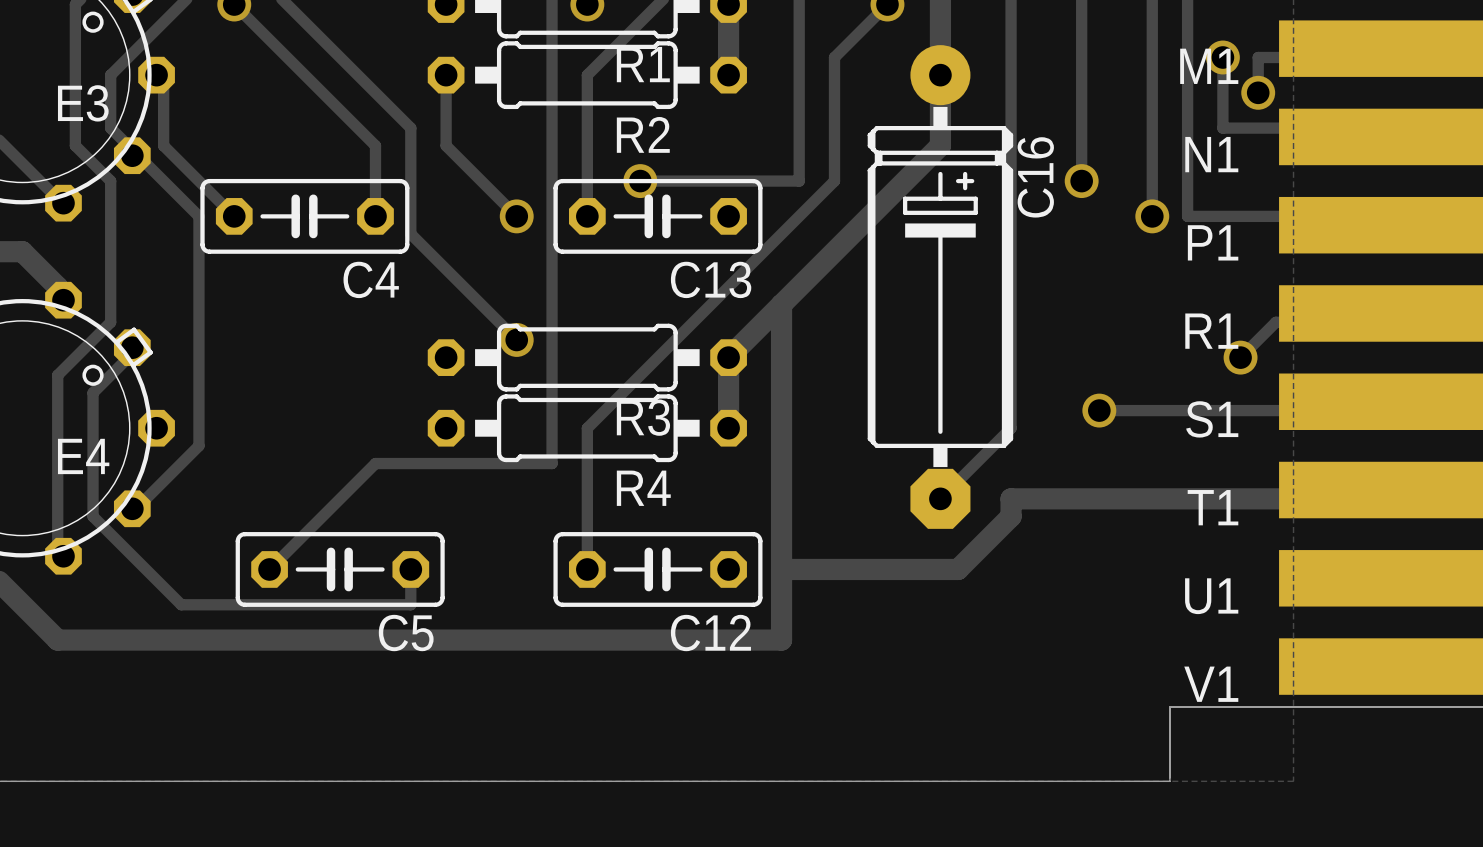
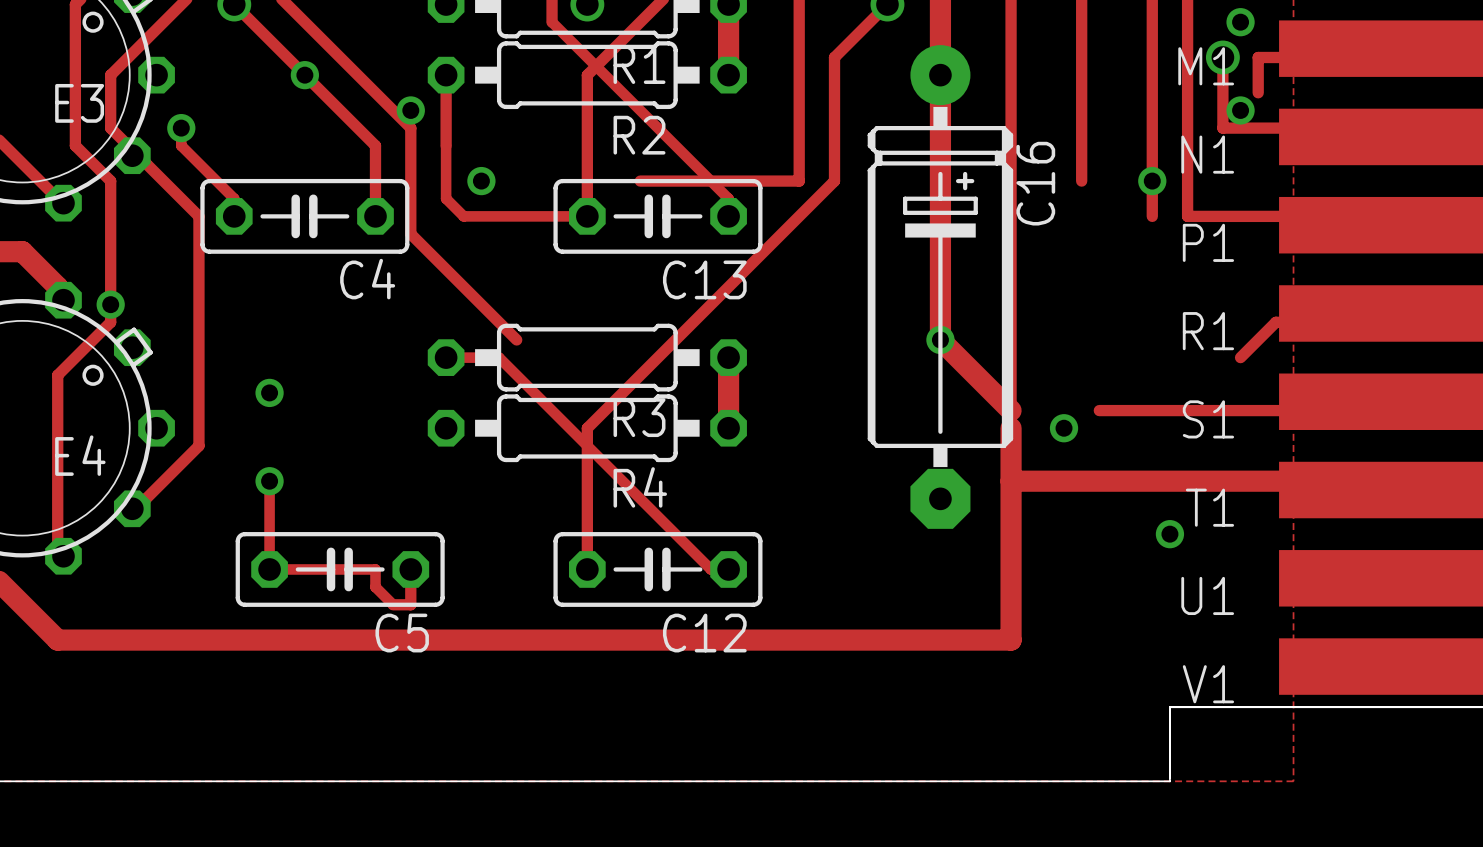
track: (552, 22) (552, 463) (375, 463) (269, 569) -> (552, 22) (728, 198) (728, 216)
via: none -> (1240, 22)
track: (156, 75) (163, 75) (163, 145) (234, 216) -> (181, 128) (181, 145) (234, 198) (234, 216)
via: none -> (304, 75)
via position: (1258, 92) -> (1240, 110)
via: none -> (410, 110)
via: none -> (181, 128)
track: (446, 145) (516, 216) -> (446, 145) (446, 198) (463, 216) (587, 216)
track: (940, 145) (728, 357) -> (940, 145) (940, 339) (1011, 410)
via: none -> (481, 181)
via: (640, 181) -> none
via: (1081, 181) -> none
via: none -> (1152, 181)
via: (516, 216) -> none
via: (1152, 216) -> none
via: none -> (110, 304)
track: (781, 304) (781, 640) -> none
via: (516, 339) -> none
via: none -> (940, 339)
track: (132, 347) (128, 357) (93, 392) (93, 516) (181, 604) (393, 604) -> (269, 481) (269, 569) (375, 569) (375, 587) (393, 604)
track: none -> (446, 357) (499, 357) (710, 569) (728, 569)
via: (1240, 357) -> none
via: none -> (269, 392)
via: (1099, 410) -> none
track: (1011, 428) (940, 498) -> (1011, 428) (1011, 498)
via: none -> (1064, 428)
via: none -> (269, 481)
track: (1461, 490) (1452, 498) (1011, 498) -> (1461, 490) (1293, 481) (1011, 481)
track: (1011, 516) (958, 569) (781, 569) -> (1011, 516) (1011, 640) (781, 640)
via: none -> (1169, 534)

